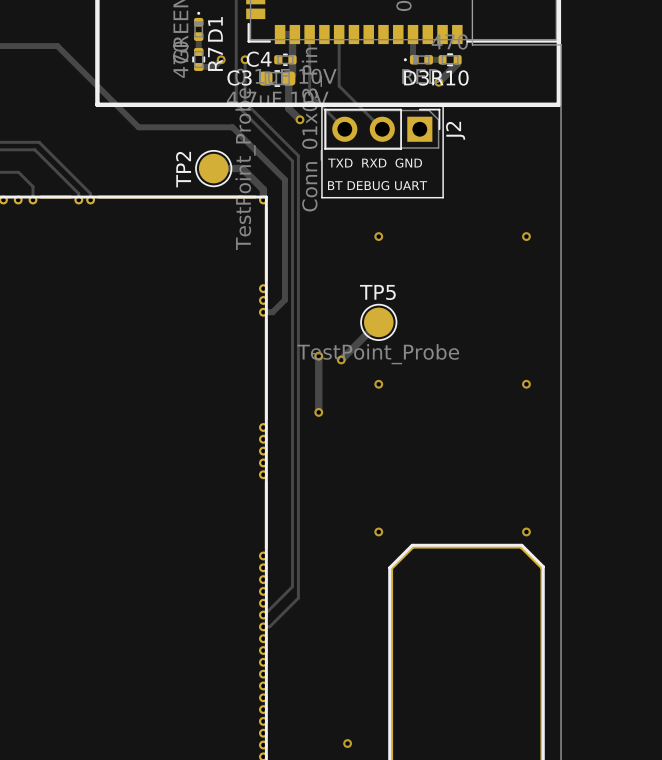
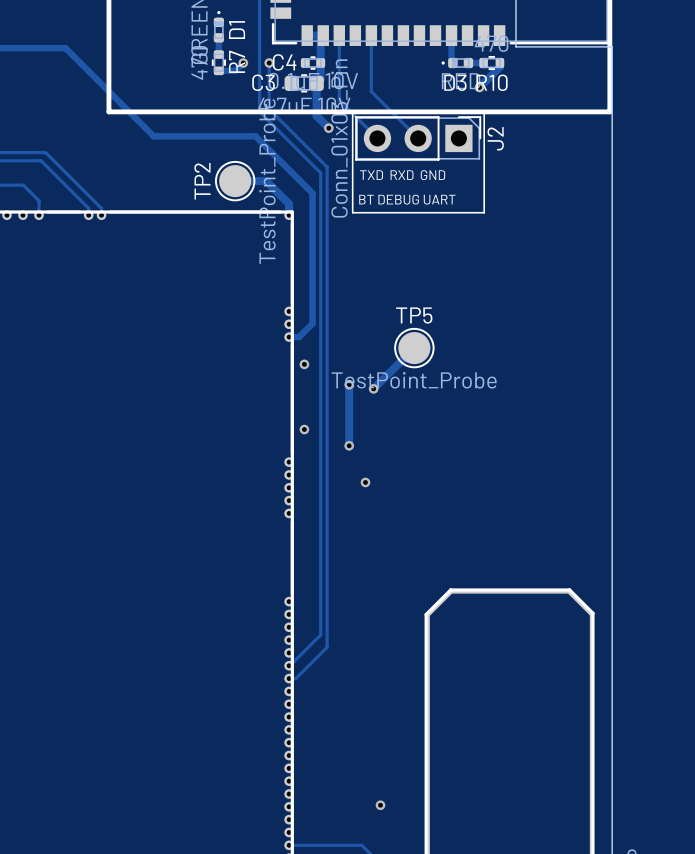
via: (378, 236) -> none
via: (526, 236) -> none
via: none -> (304, 364)
via: (378, 384) -> none
via: (526, 384) -> none
via: none -> (304, 429)
via: none -> (365, 482)
via: (378, 531) -> none
via: (526, 531) -> none

